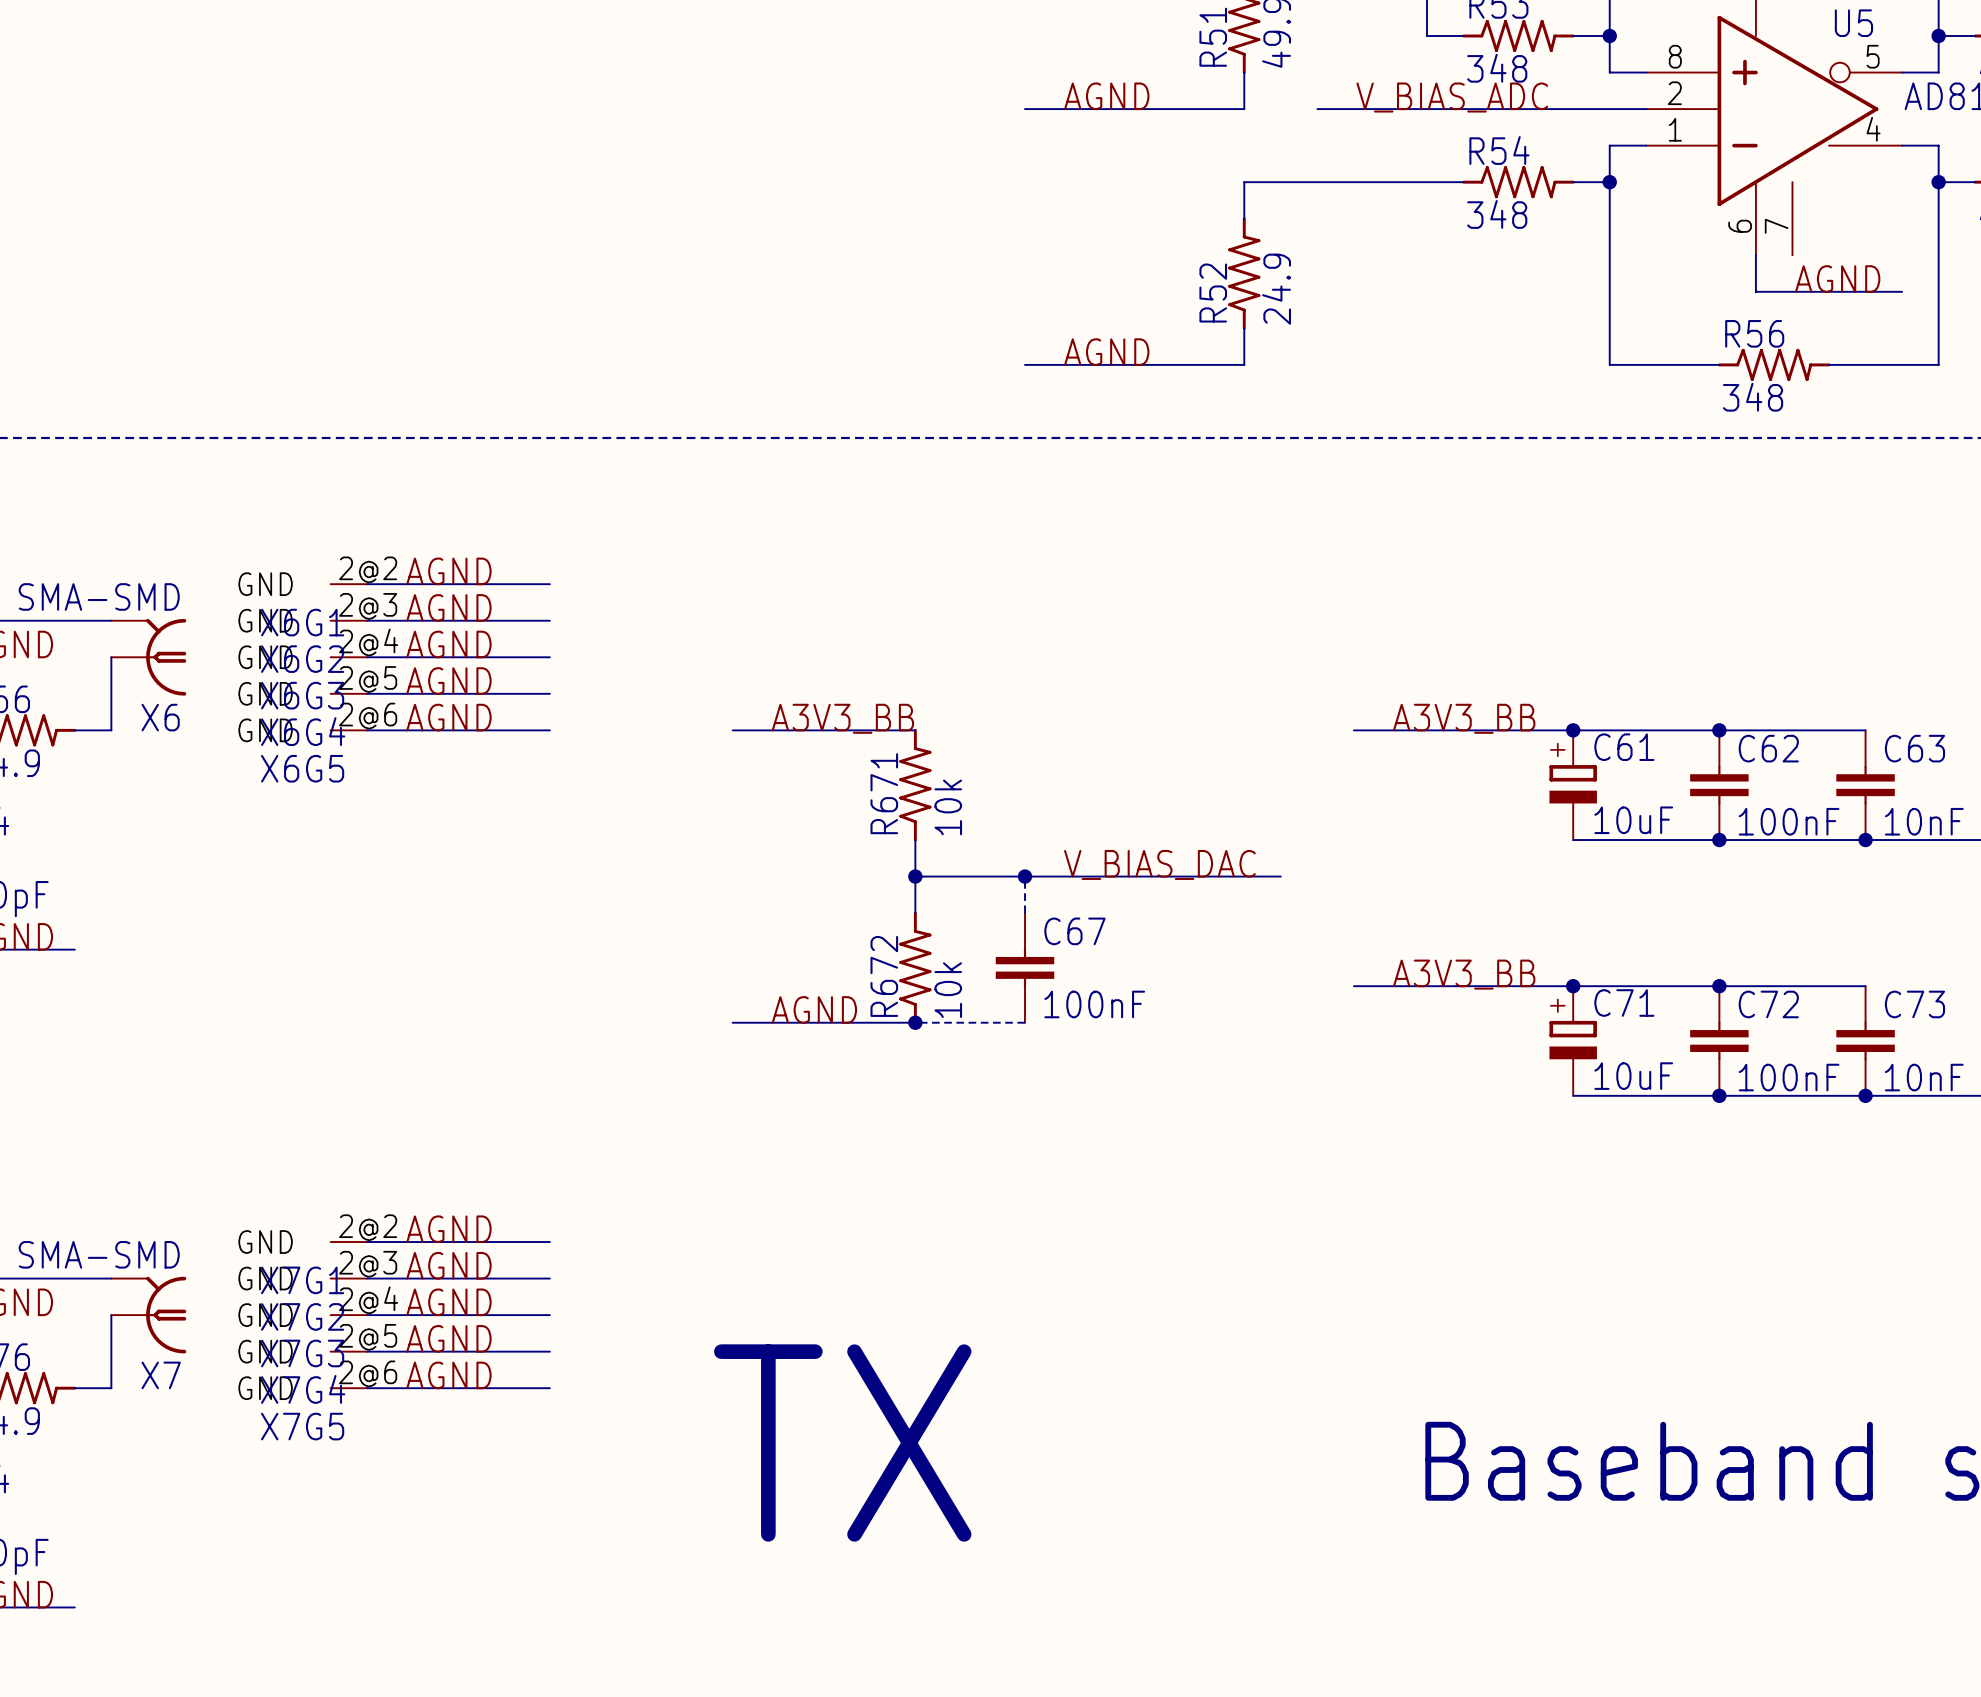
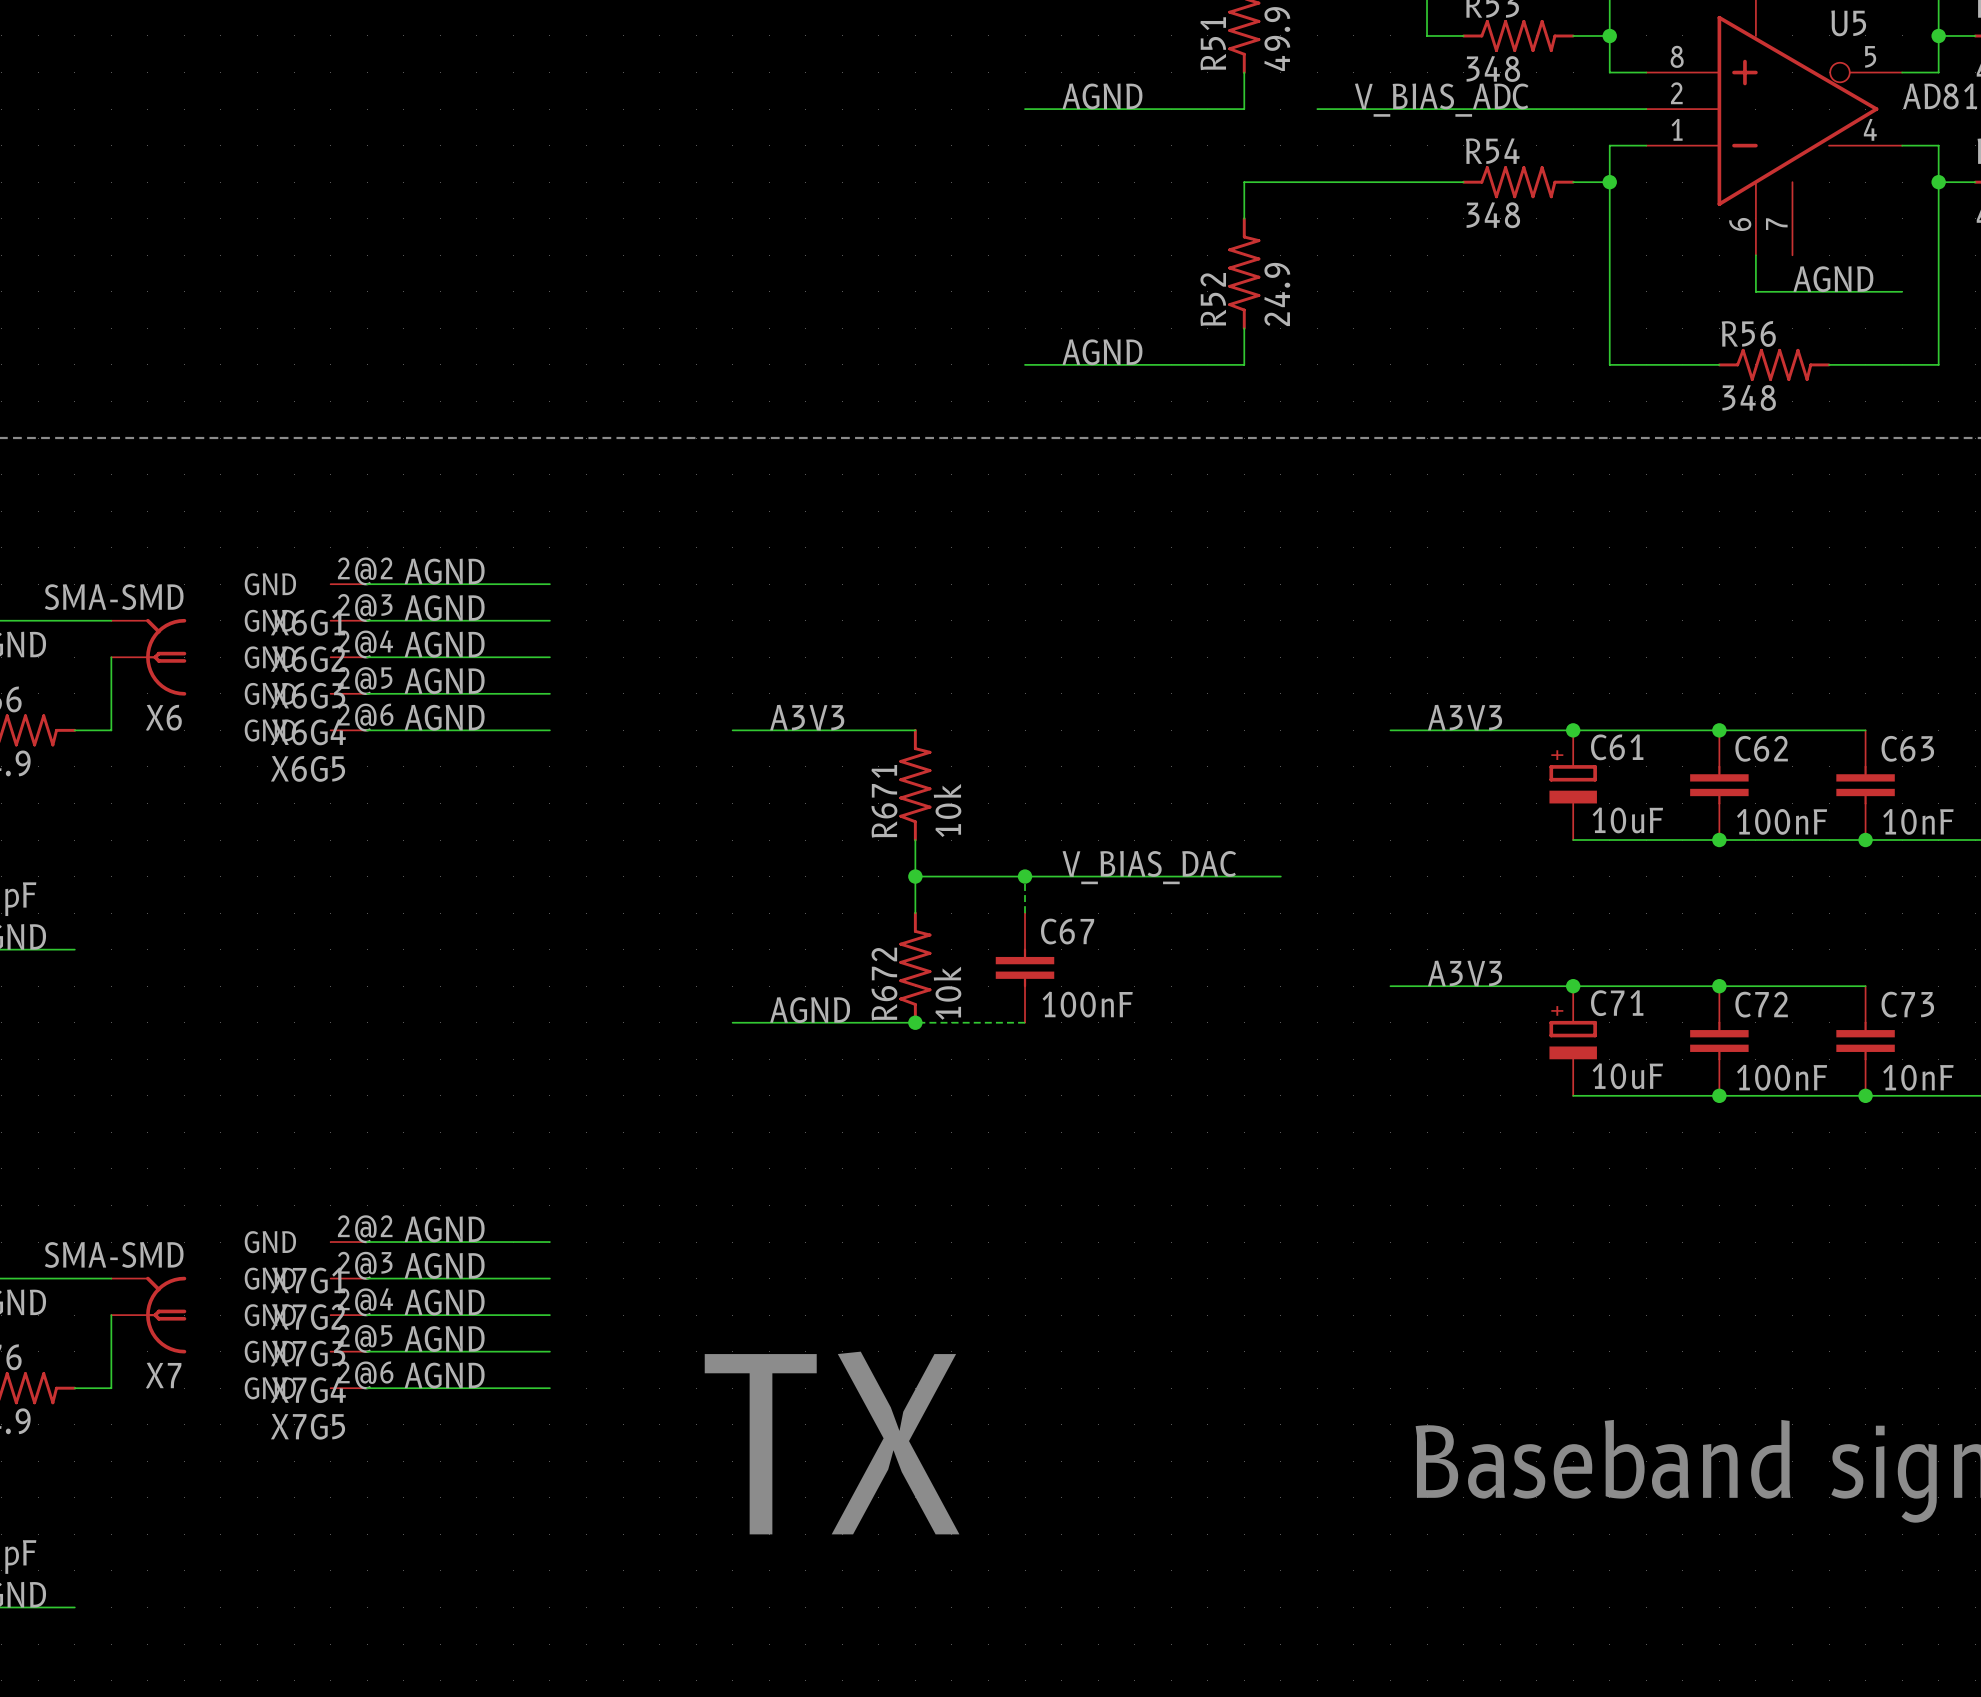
label: A3V3_BB (842, 718) -> A3V3 (807, 717)
label: A3V3_BB (1464, 718) -> A3V3 (1465, 717)
wire: (1353, 730) (1390, 730) -> none
label: A3V3_BB (1464, 974) -> A3V3 (1465, 973)
wire: (1353, 986) (1390, 986) -> none

